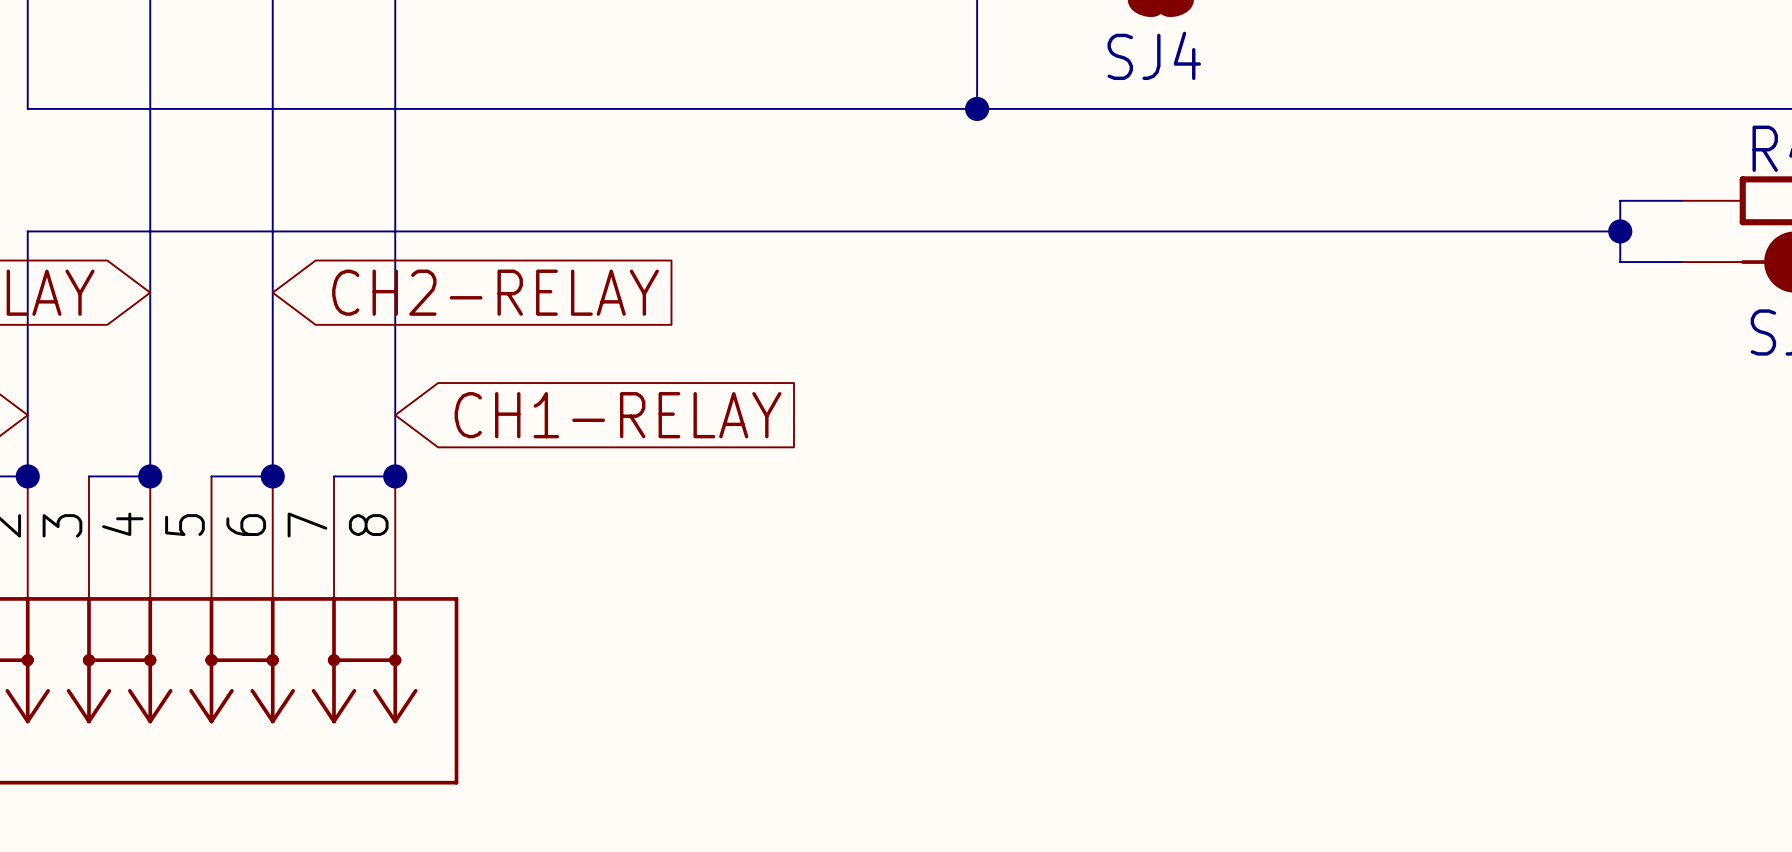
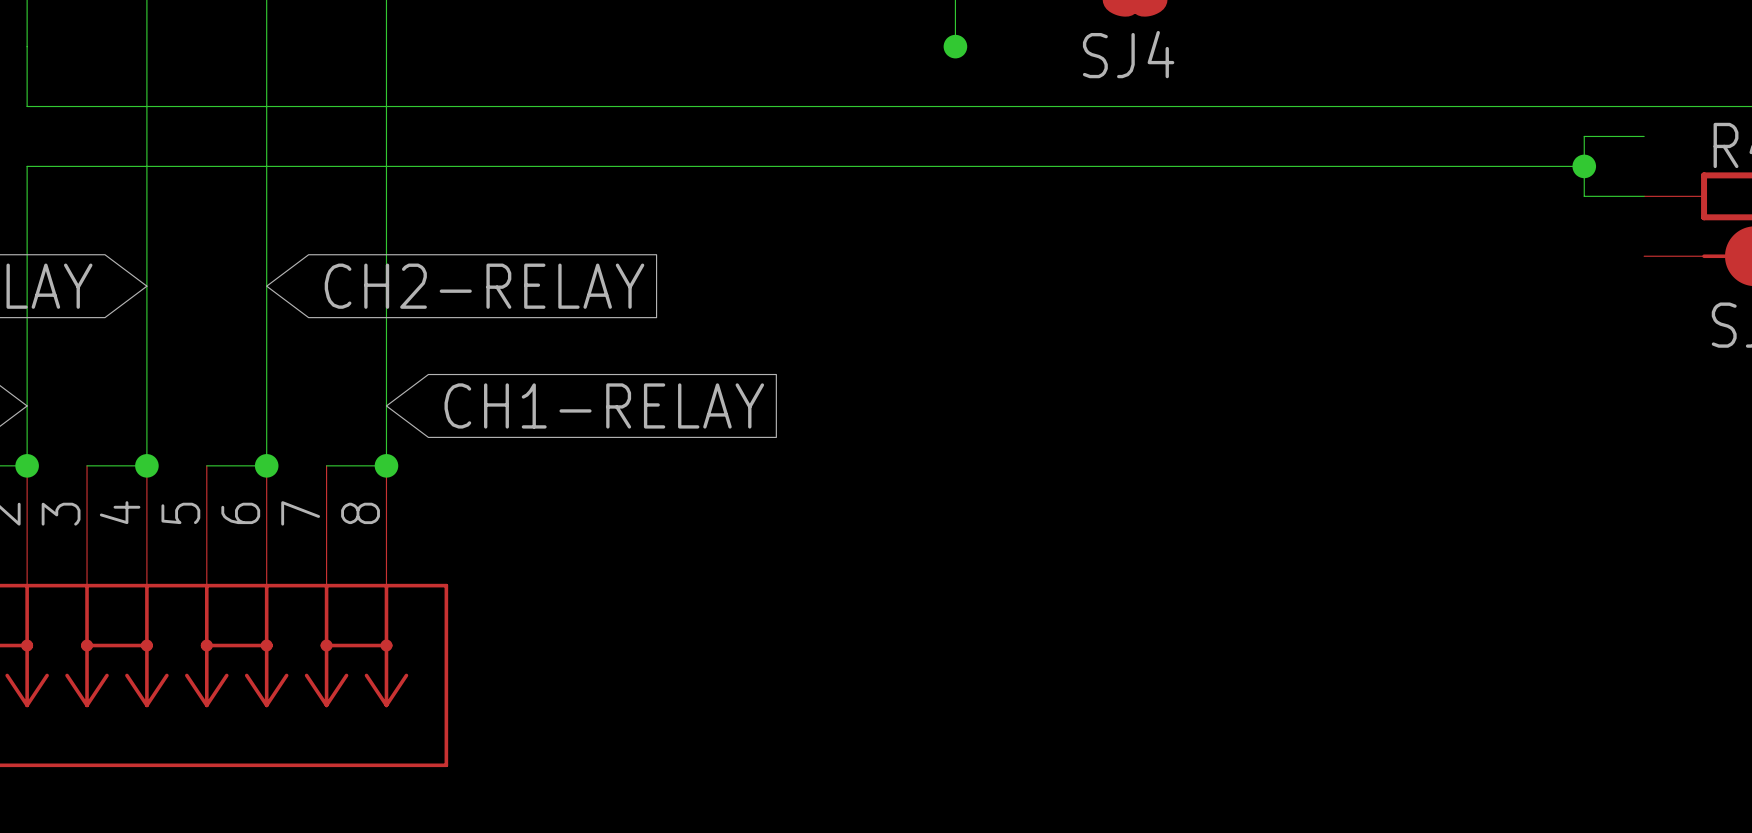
wire: (977, 47) (977, 108) -> none
junction position: (977, 108) -> (955, 46)
wire: (1620, 200) (1620, 262) (1681, 262) -> (1584, 196) (1584, 136) (1644, 136)
wire: (27, 231) (1620, 231) -> (27, 226) (27, 166) (1584, 166)
junction position: (1620, 231) -> (1584, 166)

